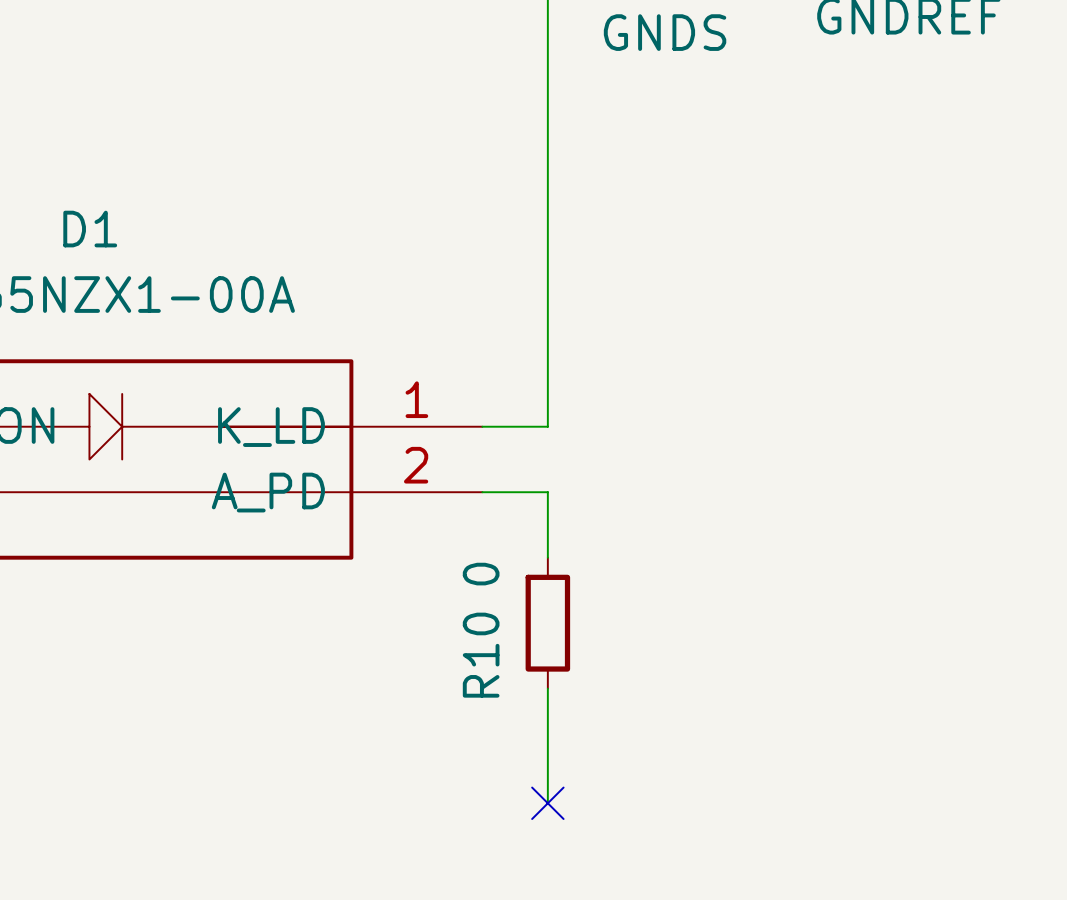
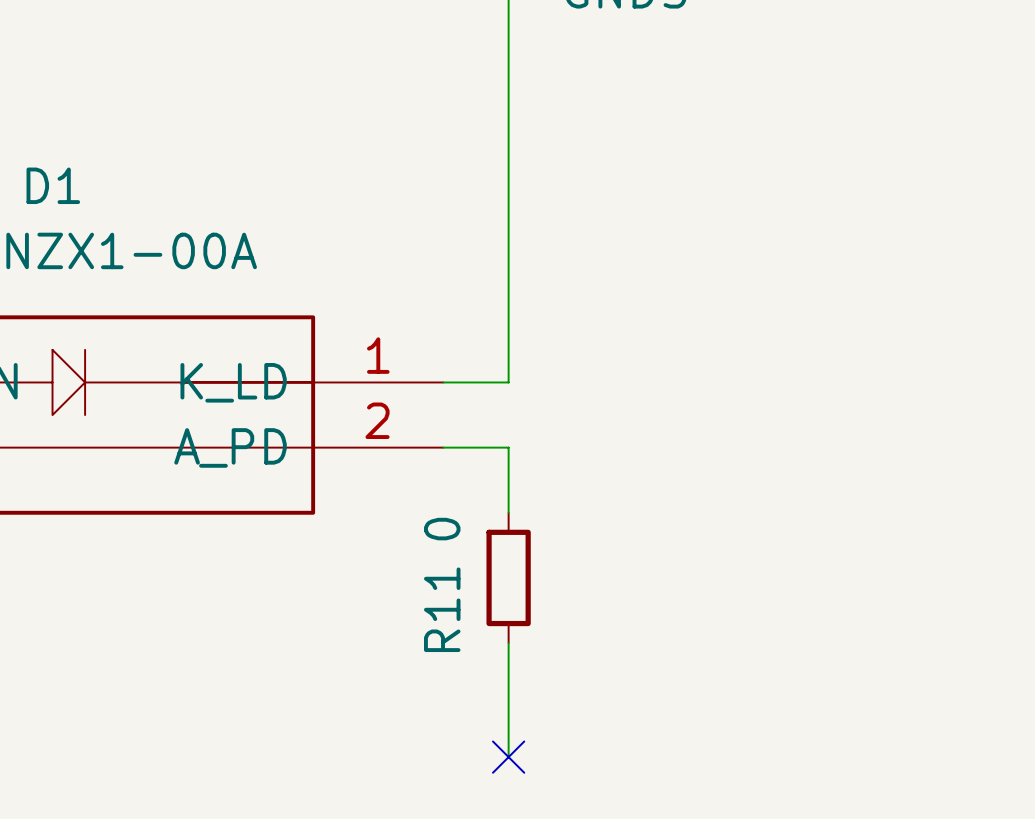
R10 name: R10 (481, 655) -> R11 (442, 609)

